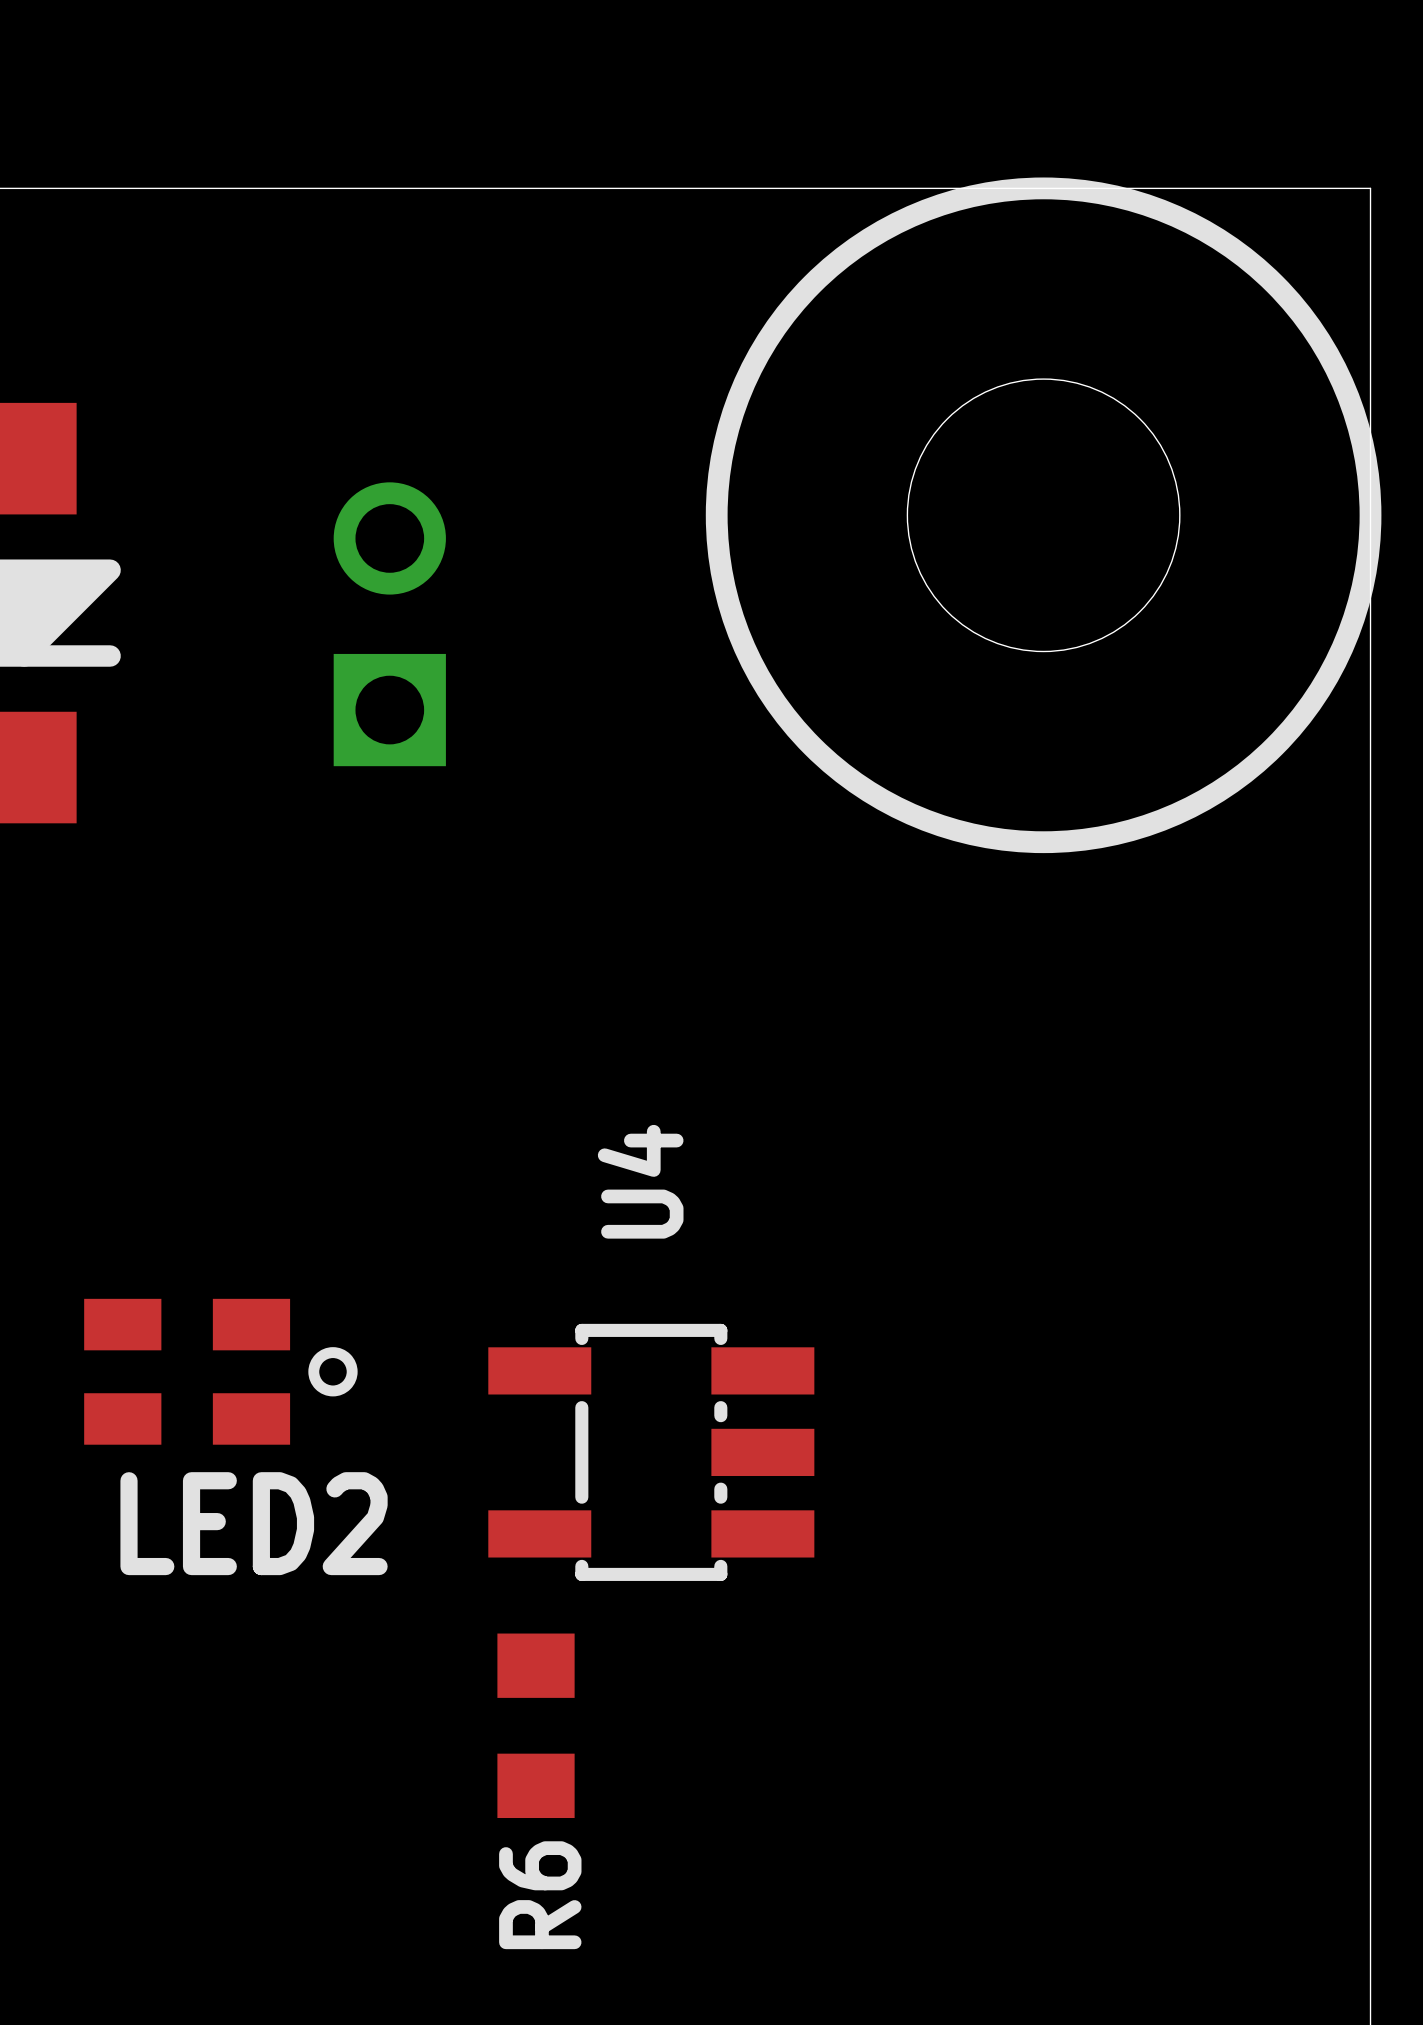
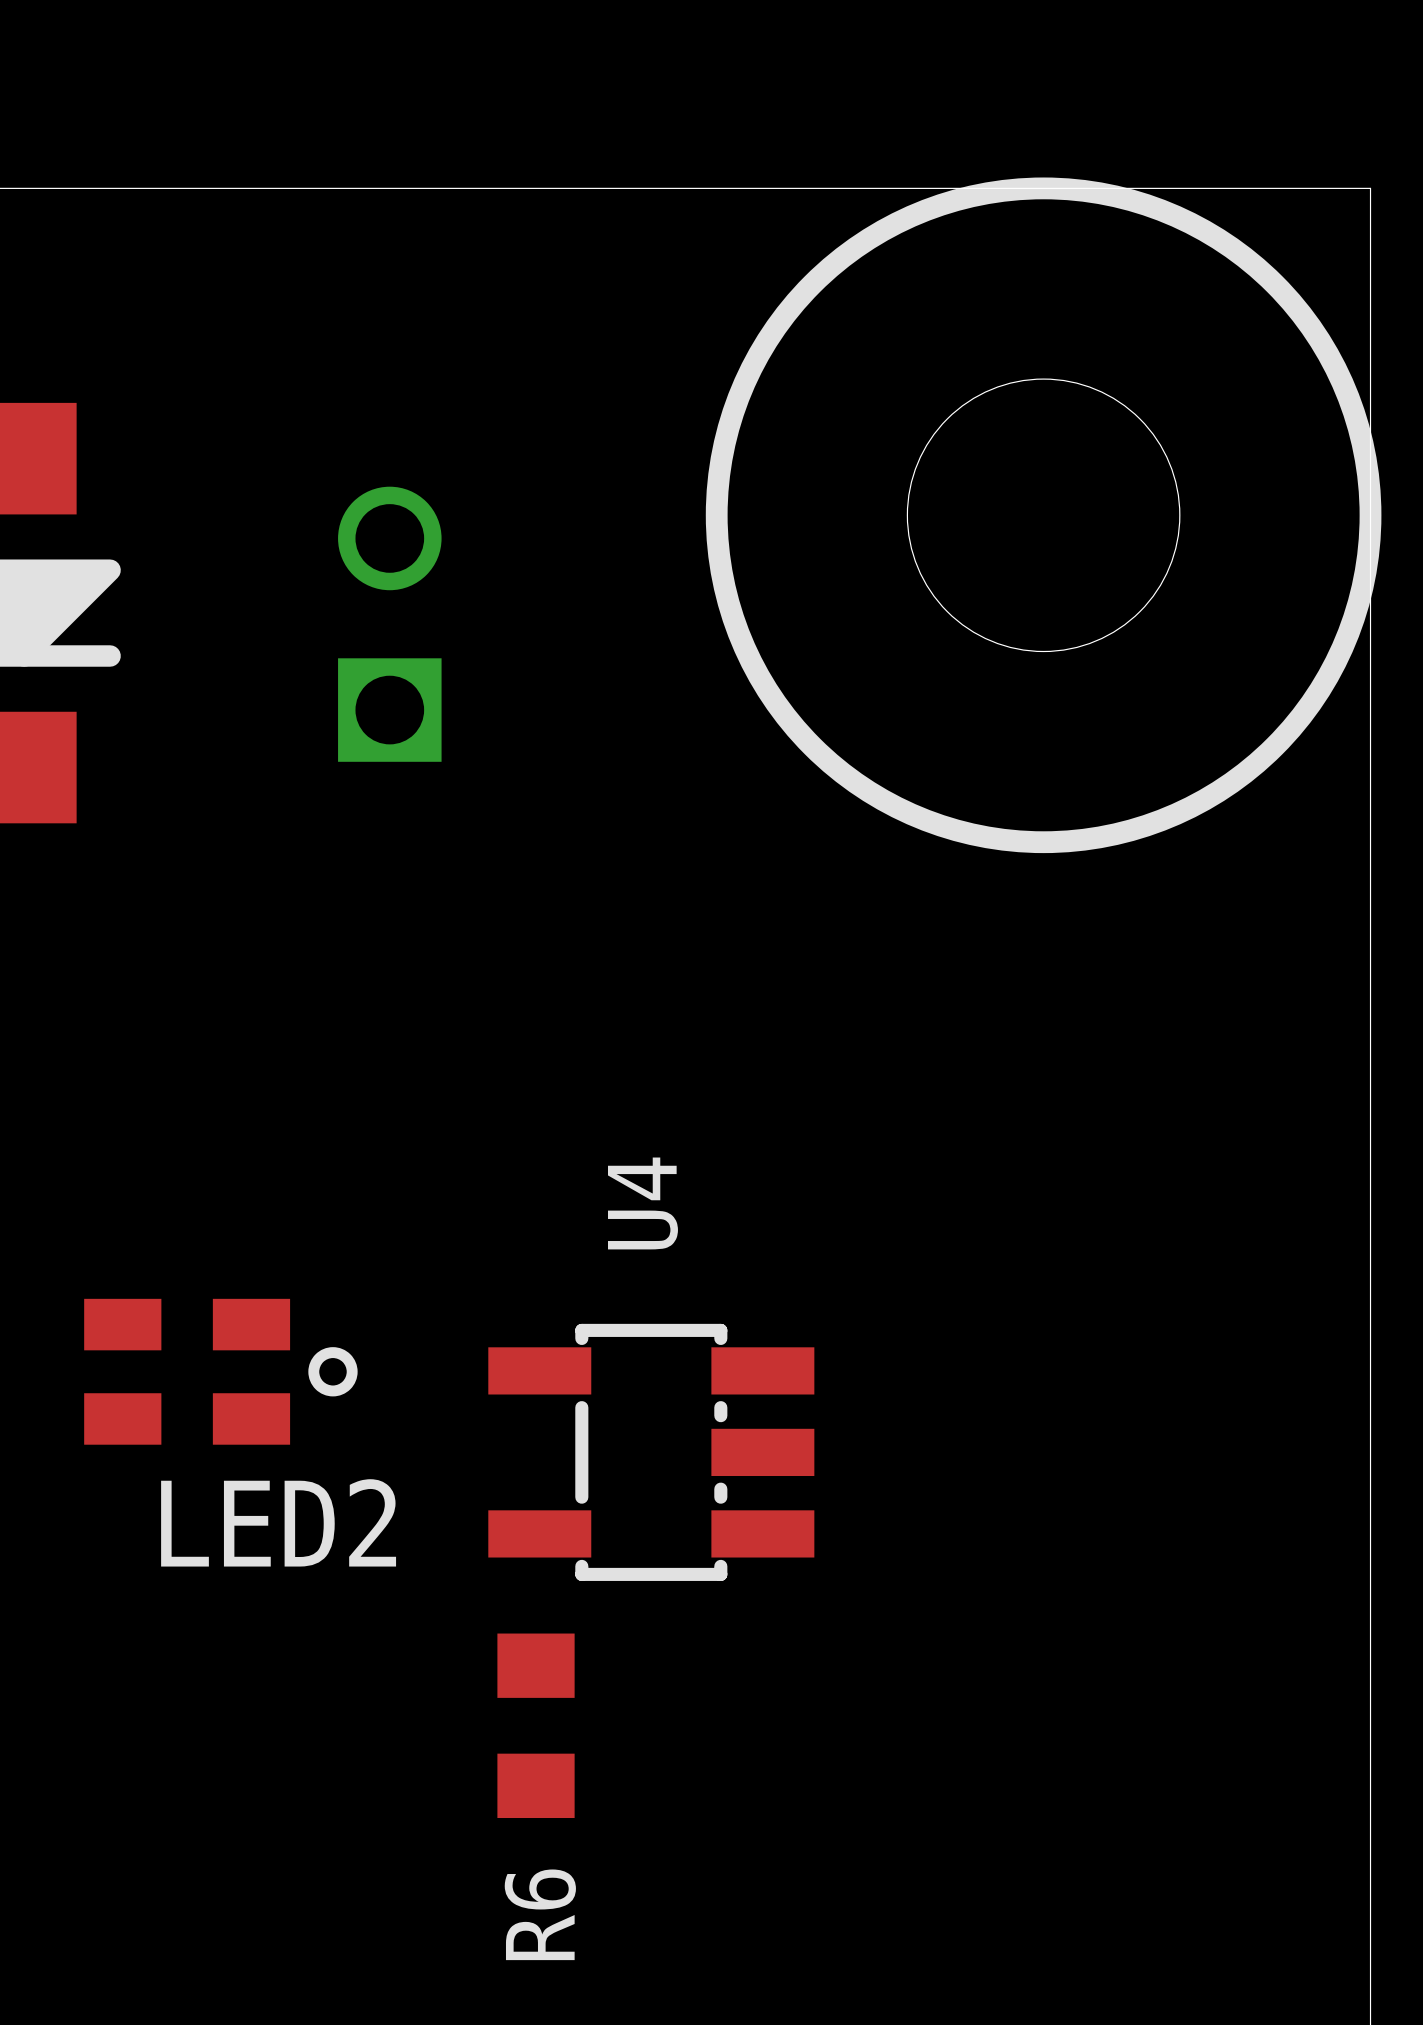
part footprint: [333, 482, 446, 767] -> [338, 486, 442, 762]

